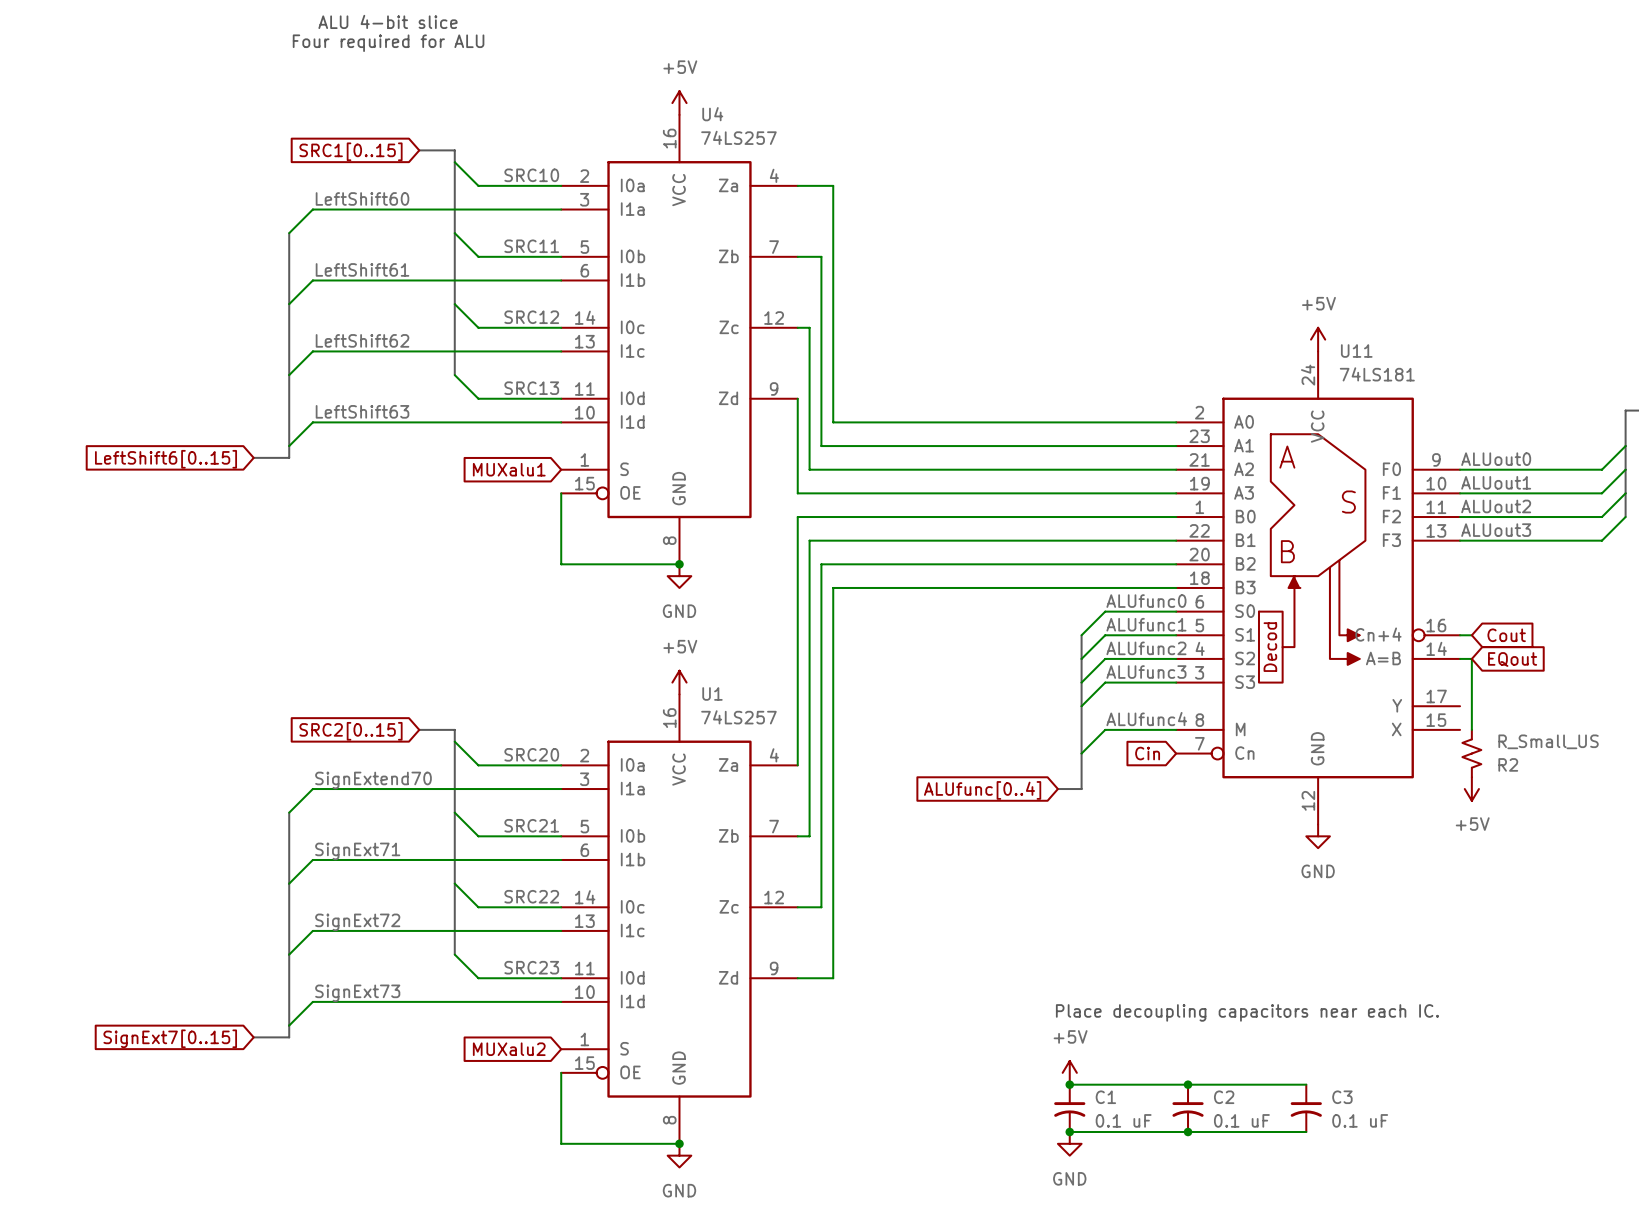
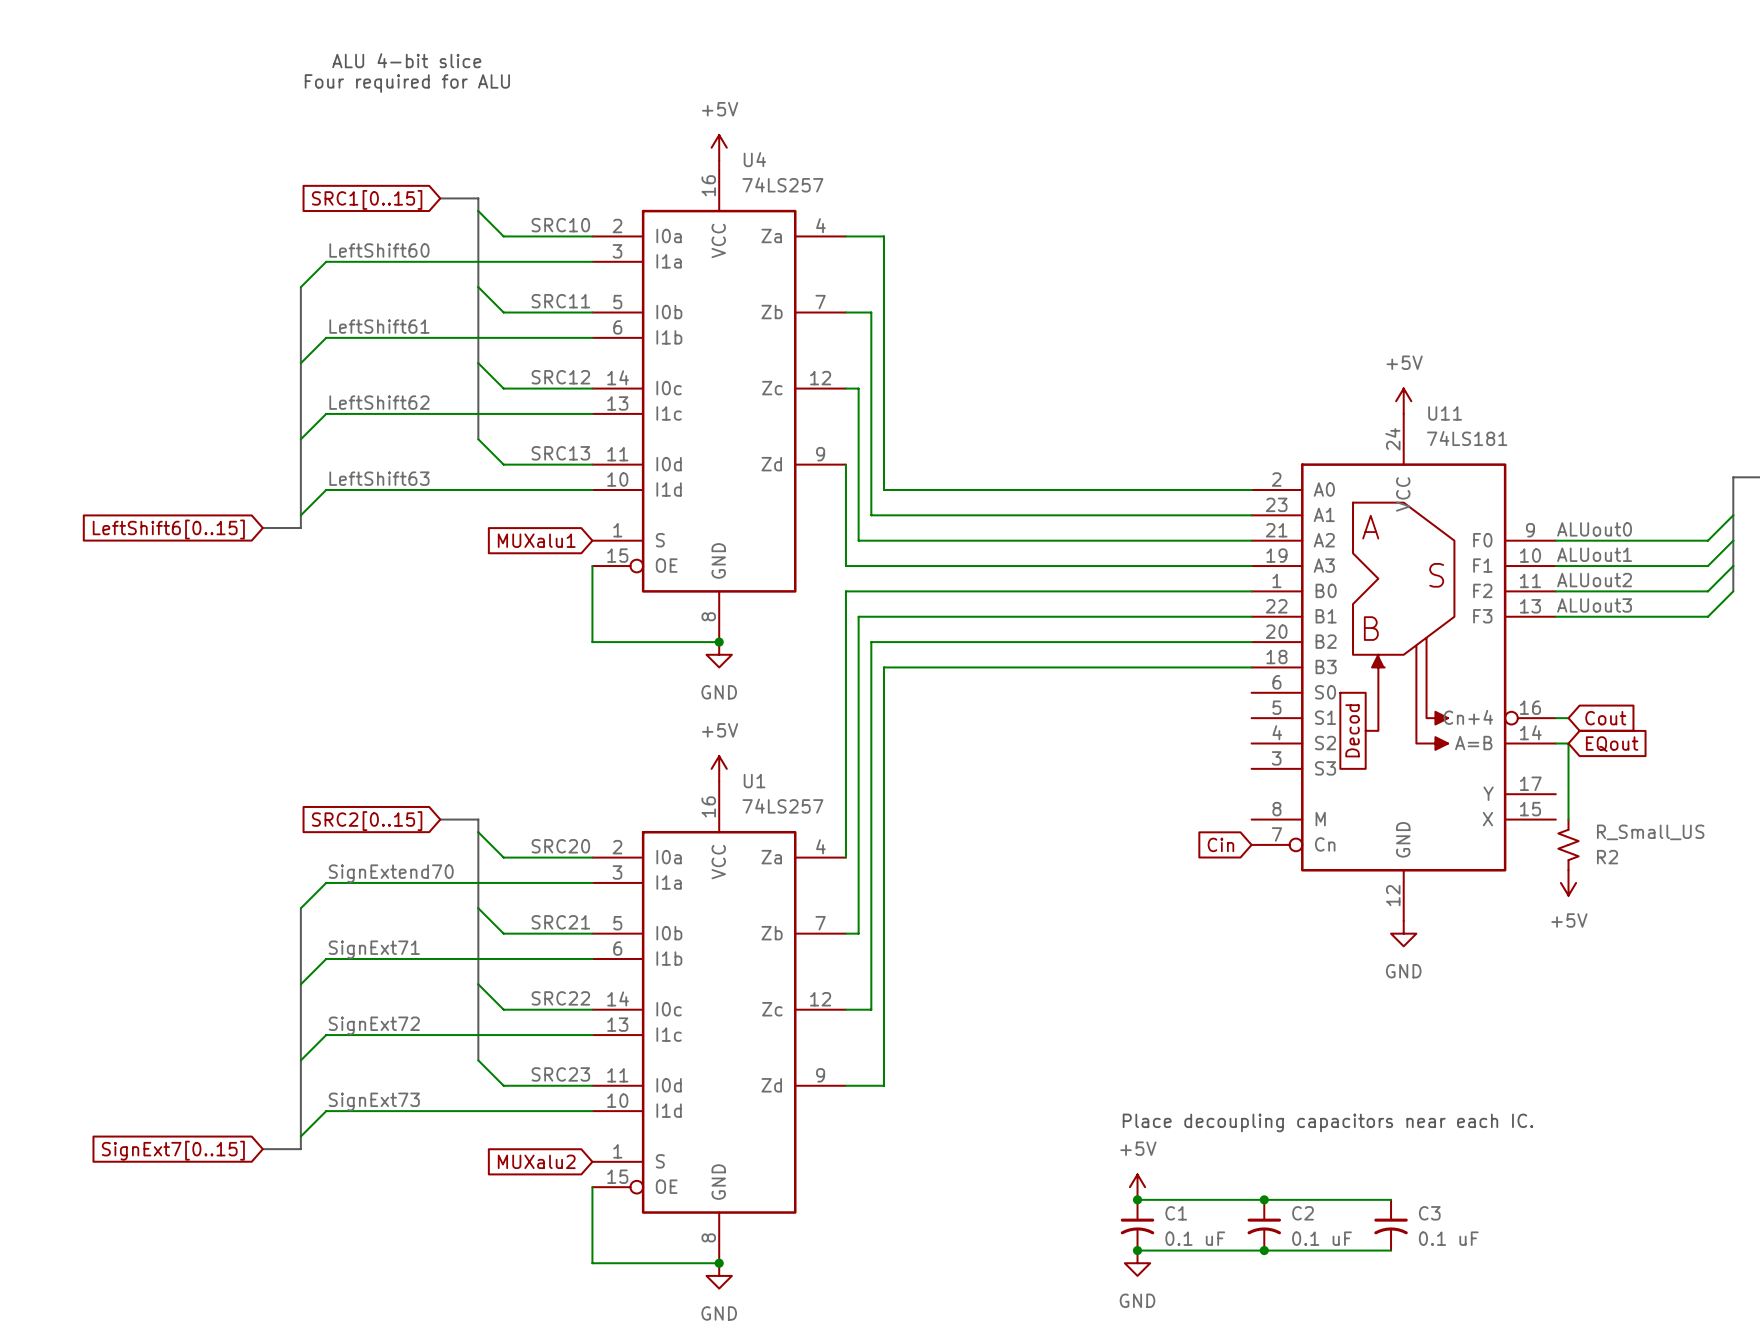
label: ALUfunc0 (1146, 601) -> none
wire: (1176, 611) (1105, 611) (1081, 635) -> none
label: ALUfunc1 (1146, 624) -> none
bus: (1081, 635) (1081, 789) (1057, 789) -> none
wire: (1176, 635) (1105, 635) (1081, 658) -> none
label: ALUfunc2 (1146, 648) -> none
wire: (1176, 658) (1105, 658) (1081, 682) -> none
label: ALUfunc3 (1146, 672) -> none
wire: (1176, 682) (1105, 682) (1081, 706) -> none
label: ALUfunc4 (1146, 719) -> none
wire: (1176, 729) (1105, 729) (1081, 753) -> none
global label: ALUfunc[0..4] (982, 790) -> none

